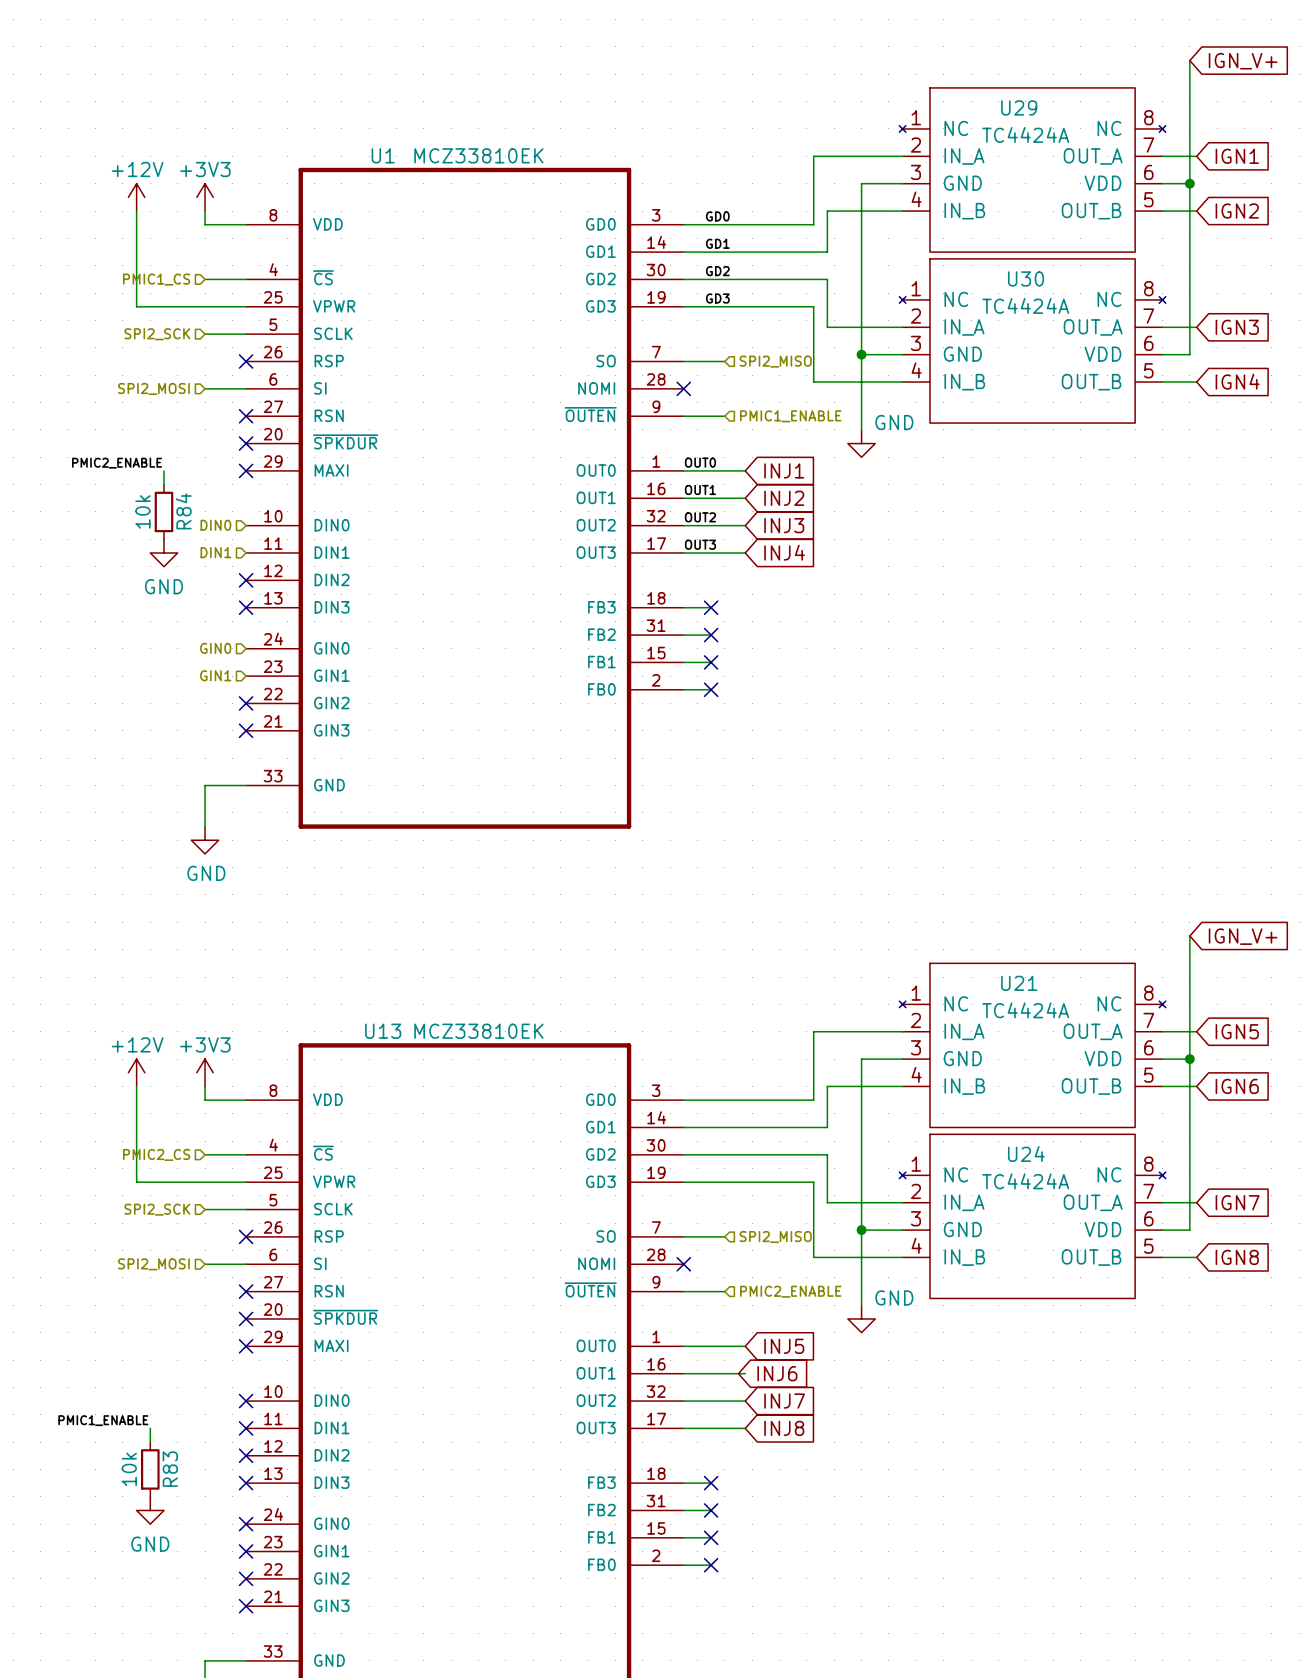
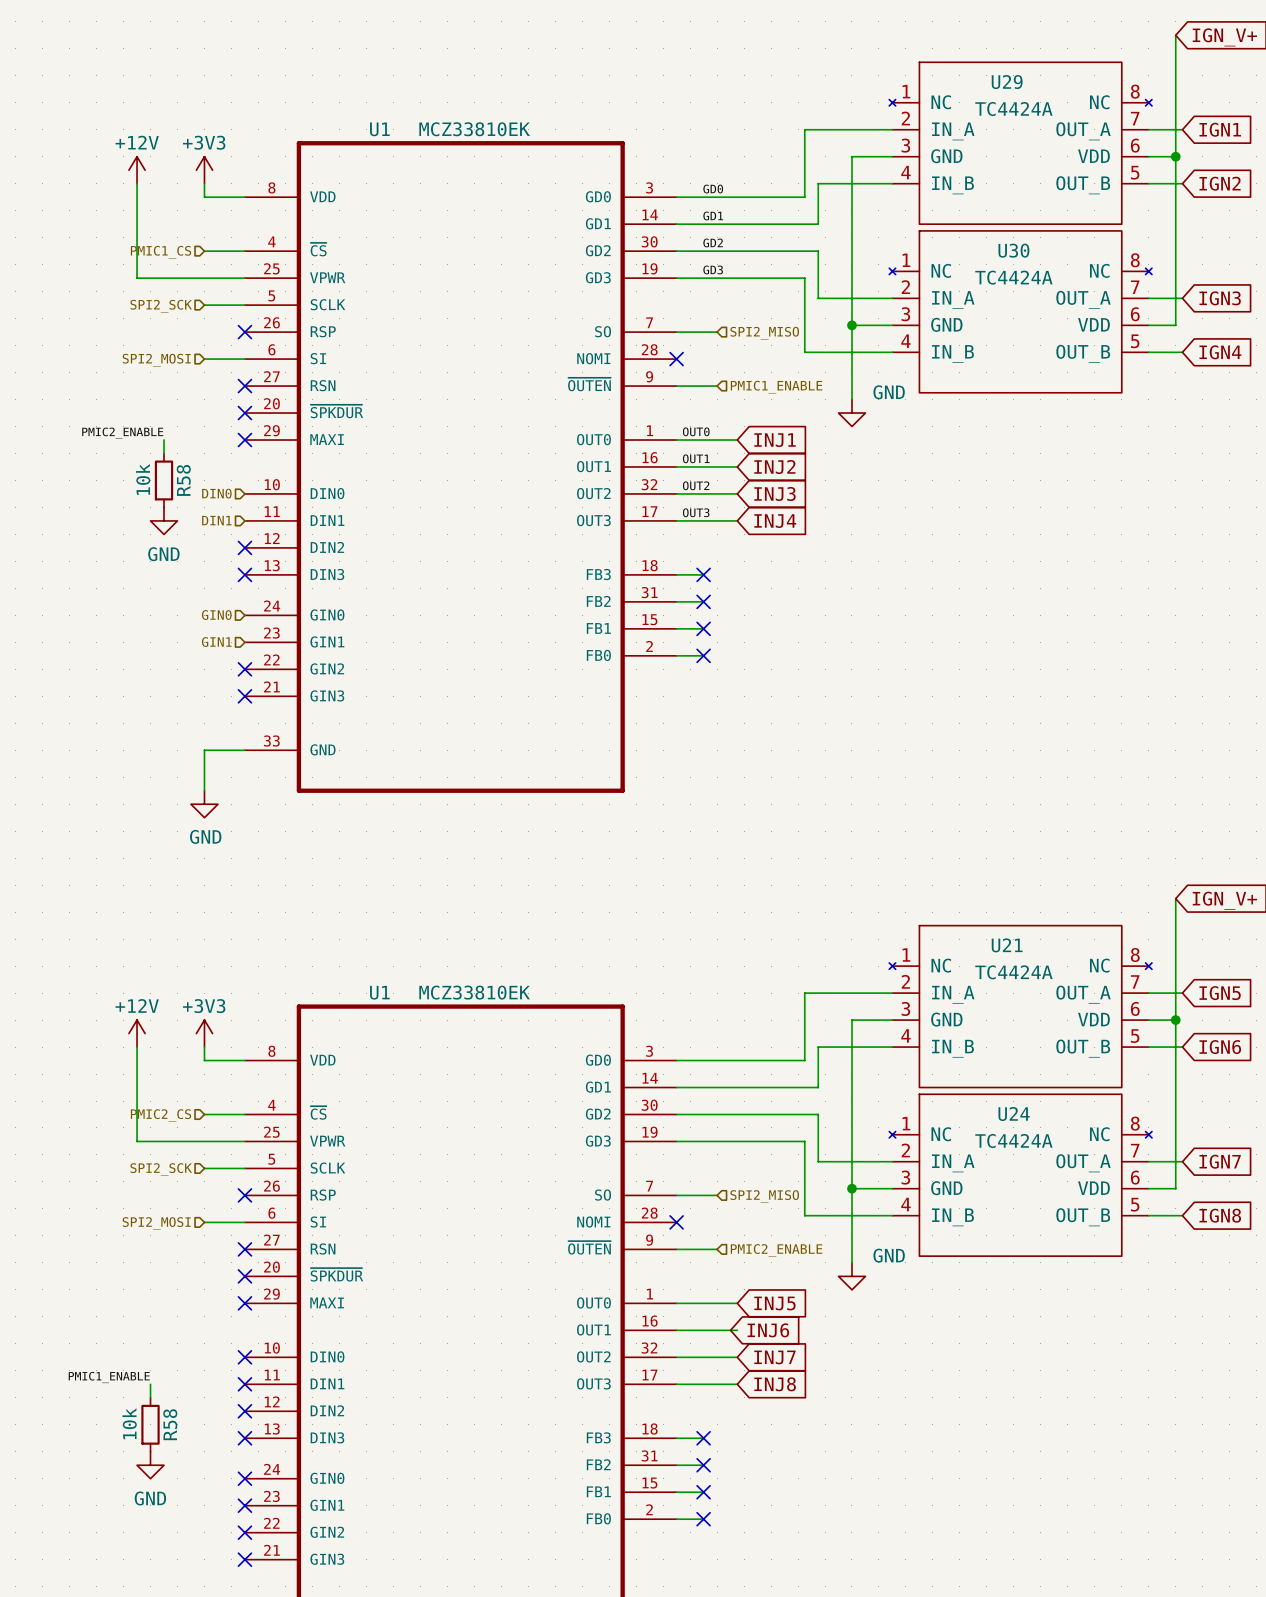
R84 name: R84 (183, 511) -> R58 (183, 480)
U13 name: U13 (383, 1031) -> U1 (379, 992)
R83 name: R83 (170, 1469) -> R58 (170, 1424)

